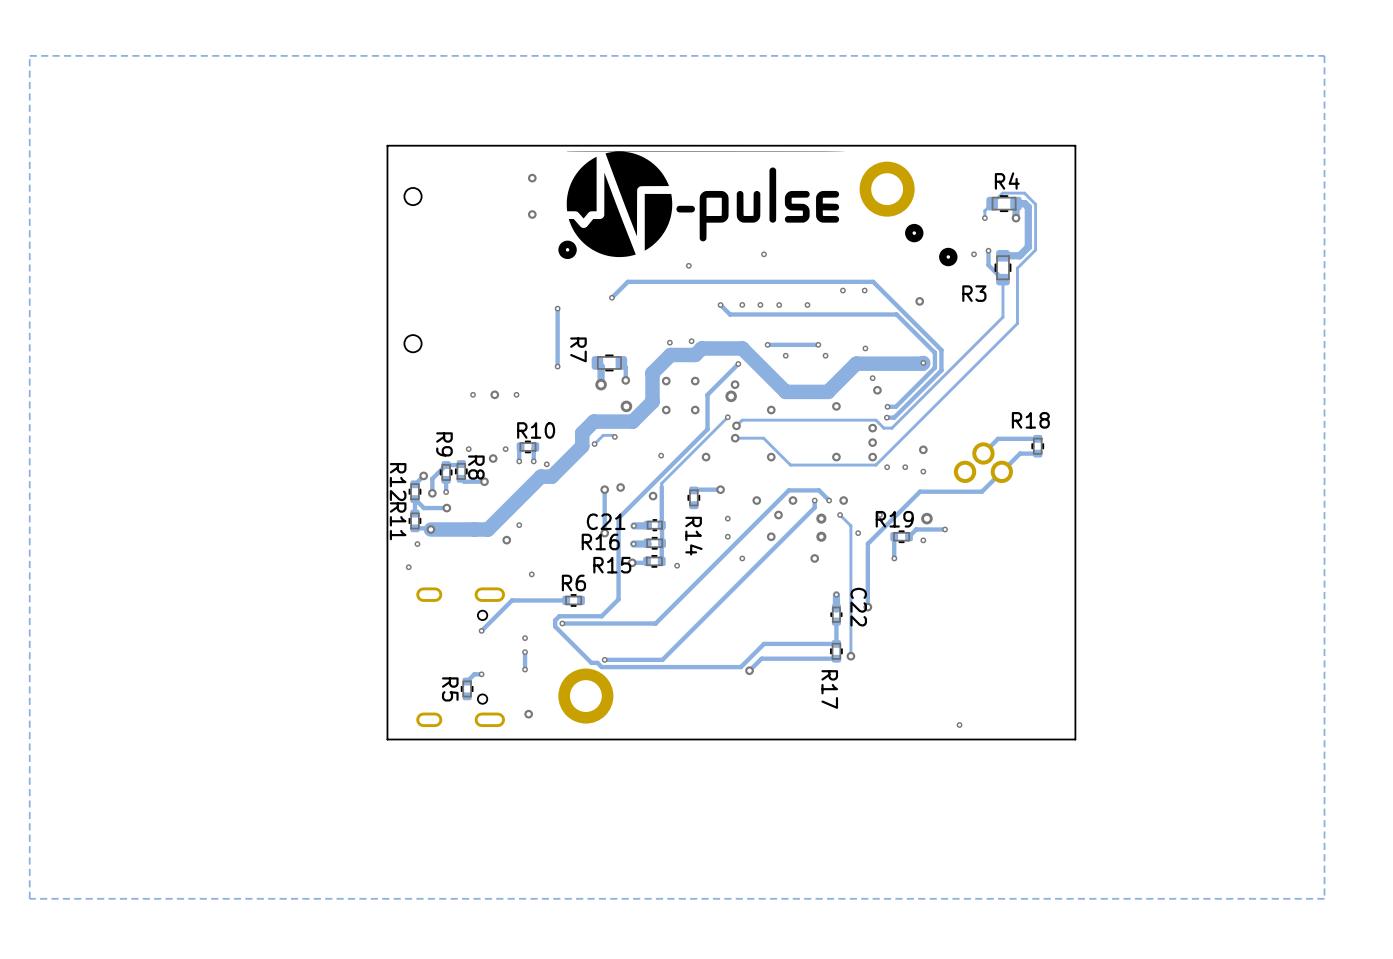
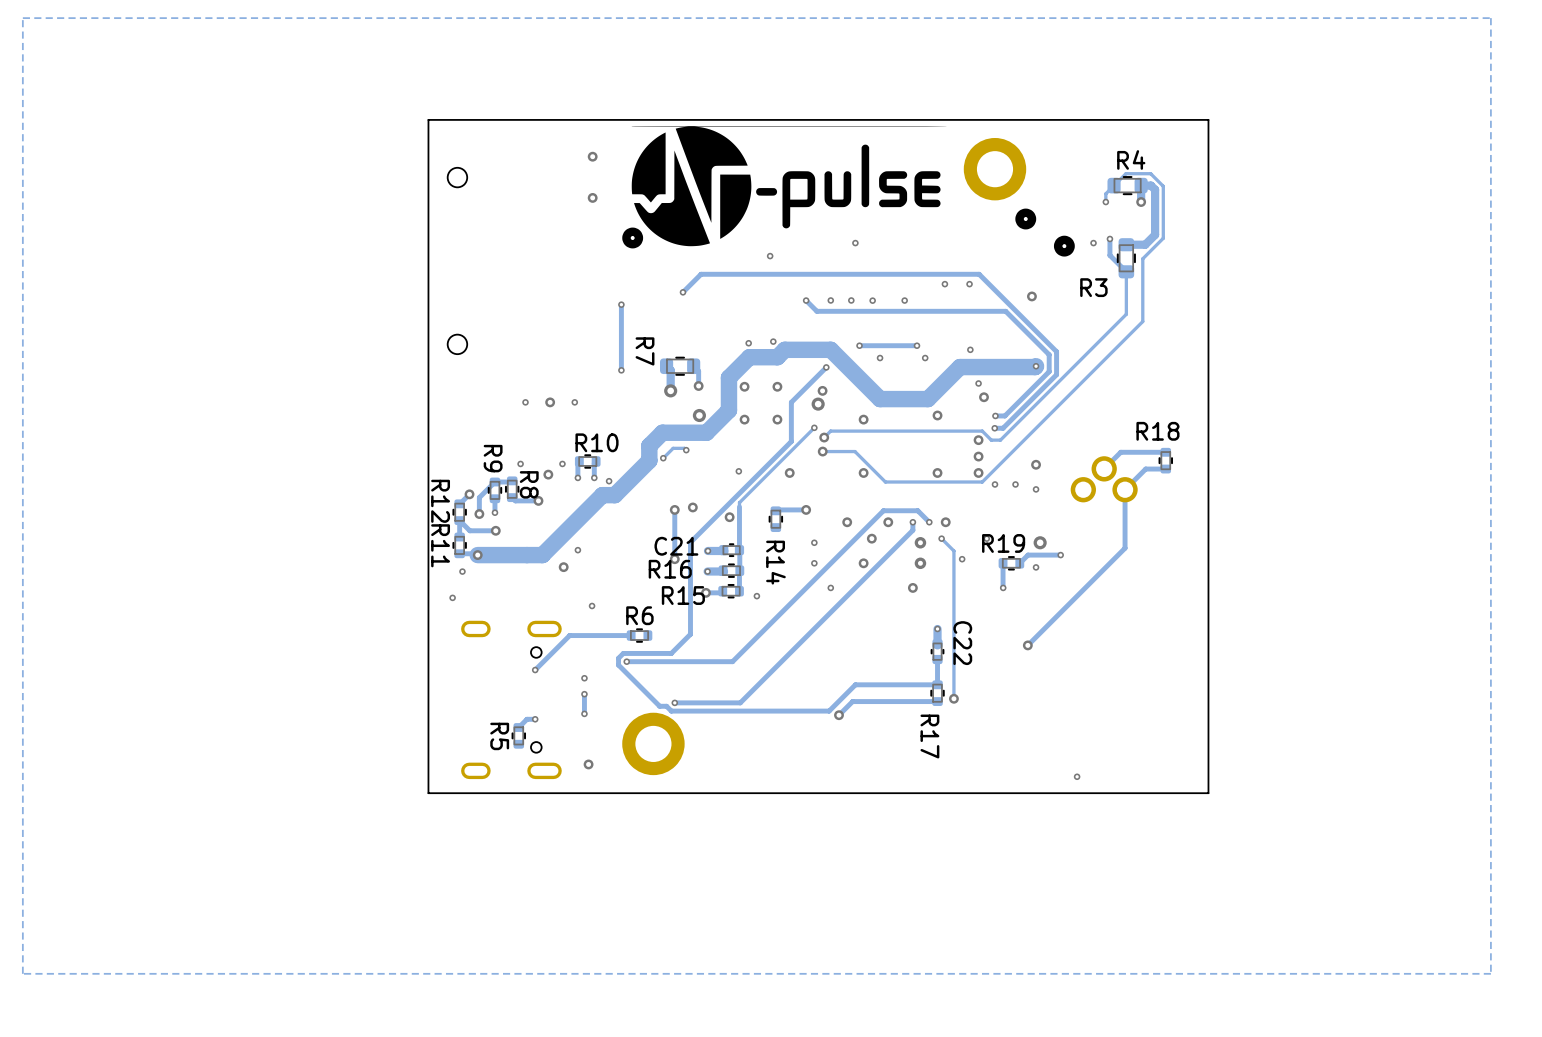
track: (1001, 471) (981, 491) (920, 491) (867, 543) (867, 607) -> (1125, 489) (1125, 548) (1027, 645)
via position: (867, 607) -> (1027, 645)

